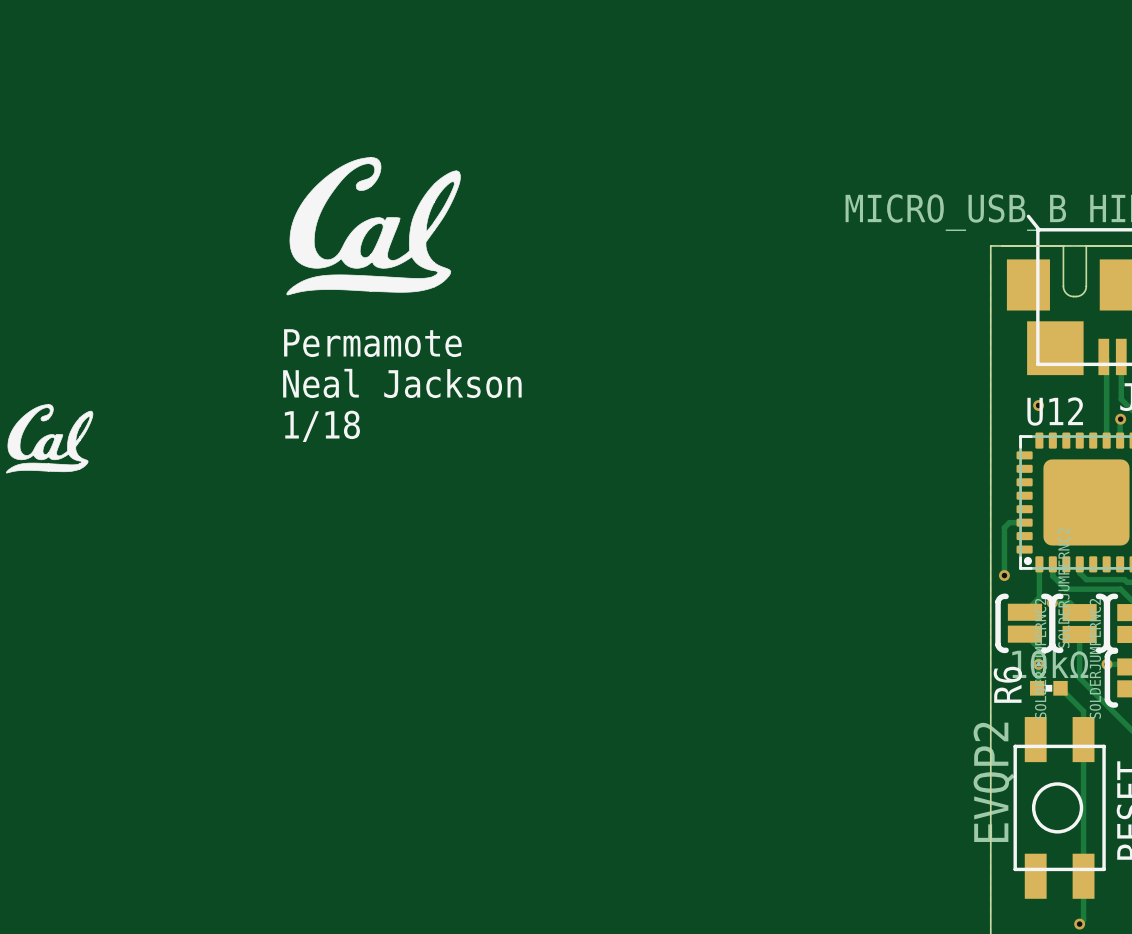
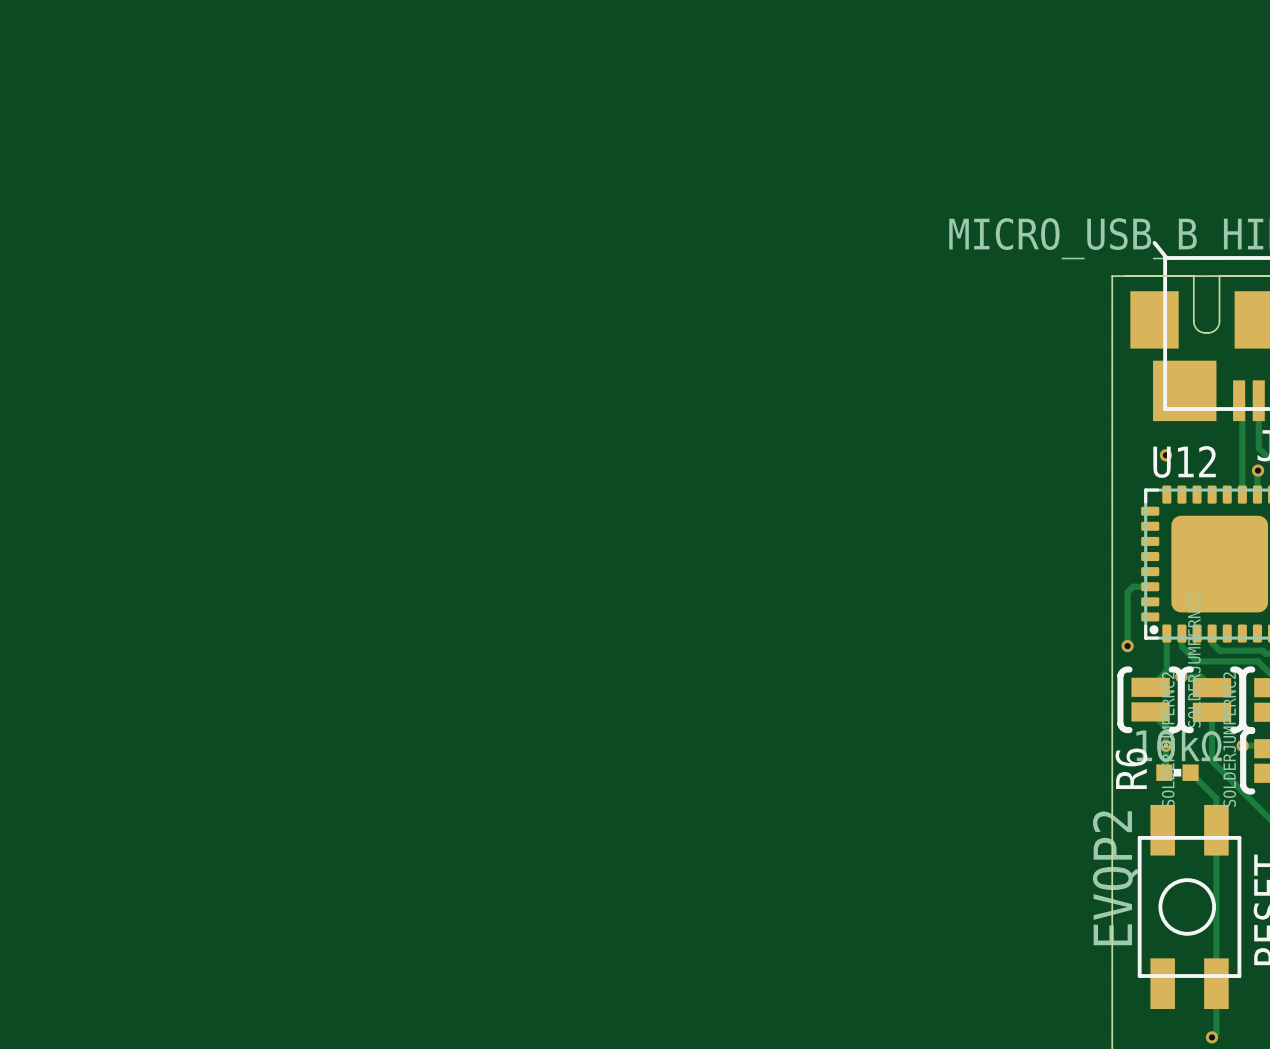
drawing: [286, 157, 461, 296] -> none
text: Permamote (372, 343) -> none
text: Neal Jackson (402, 383) -> none
drawing: [6, 404, 94, 474] -> none
text: 1/18 (322, 426) -> none

